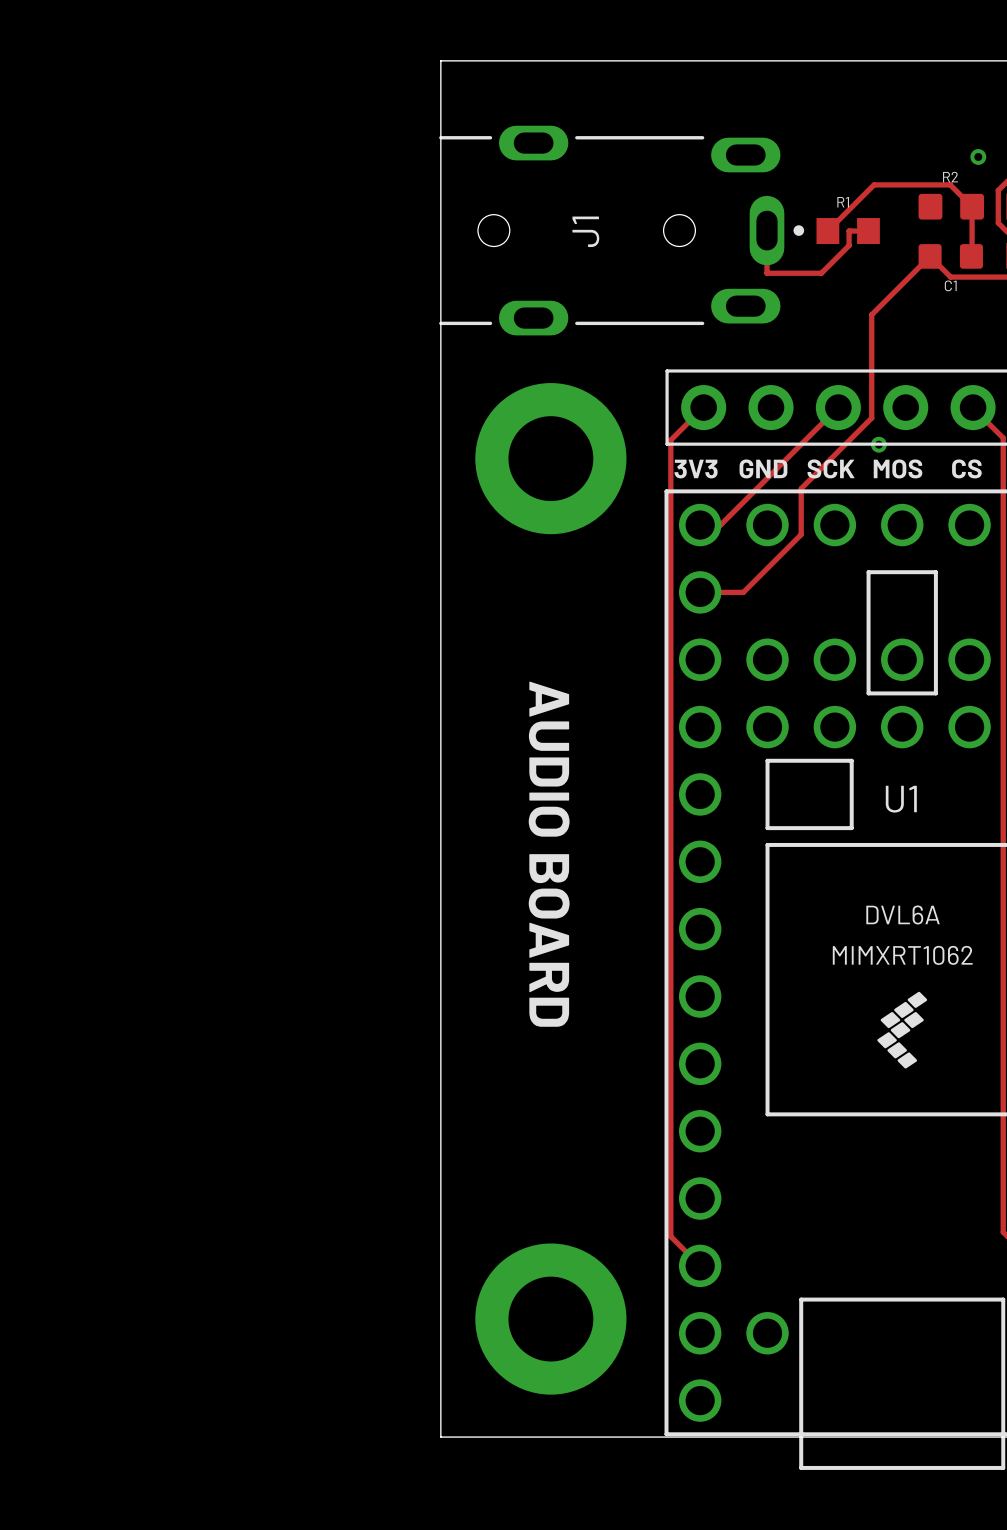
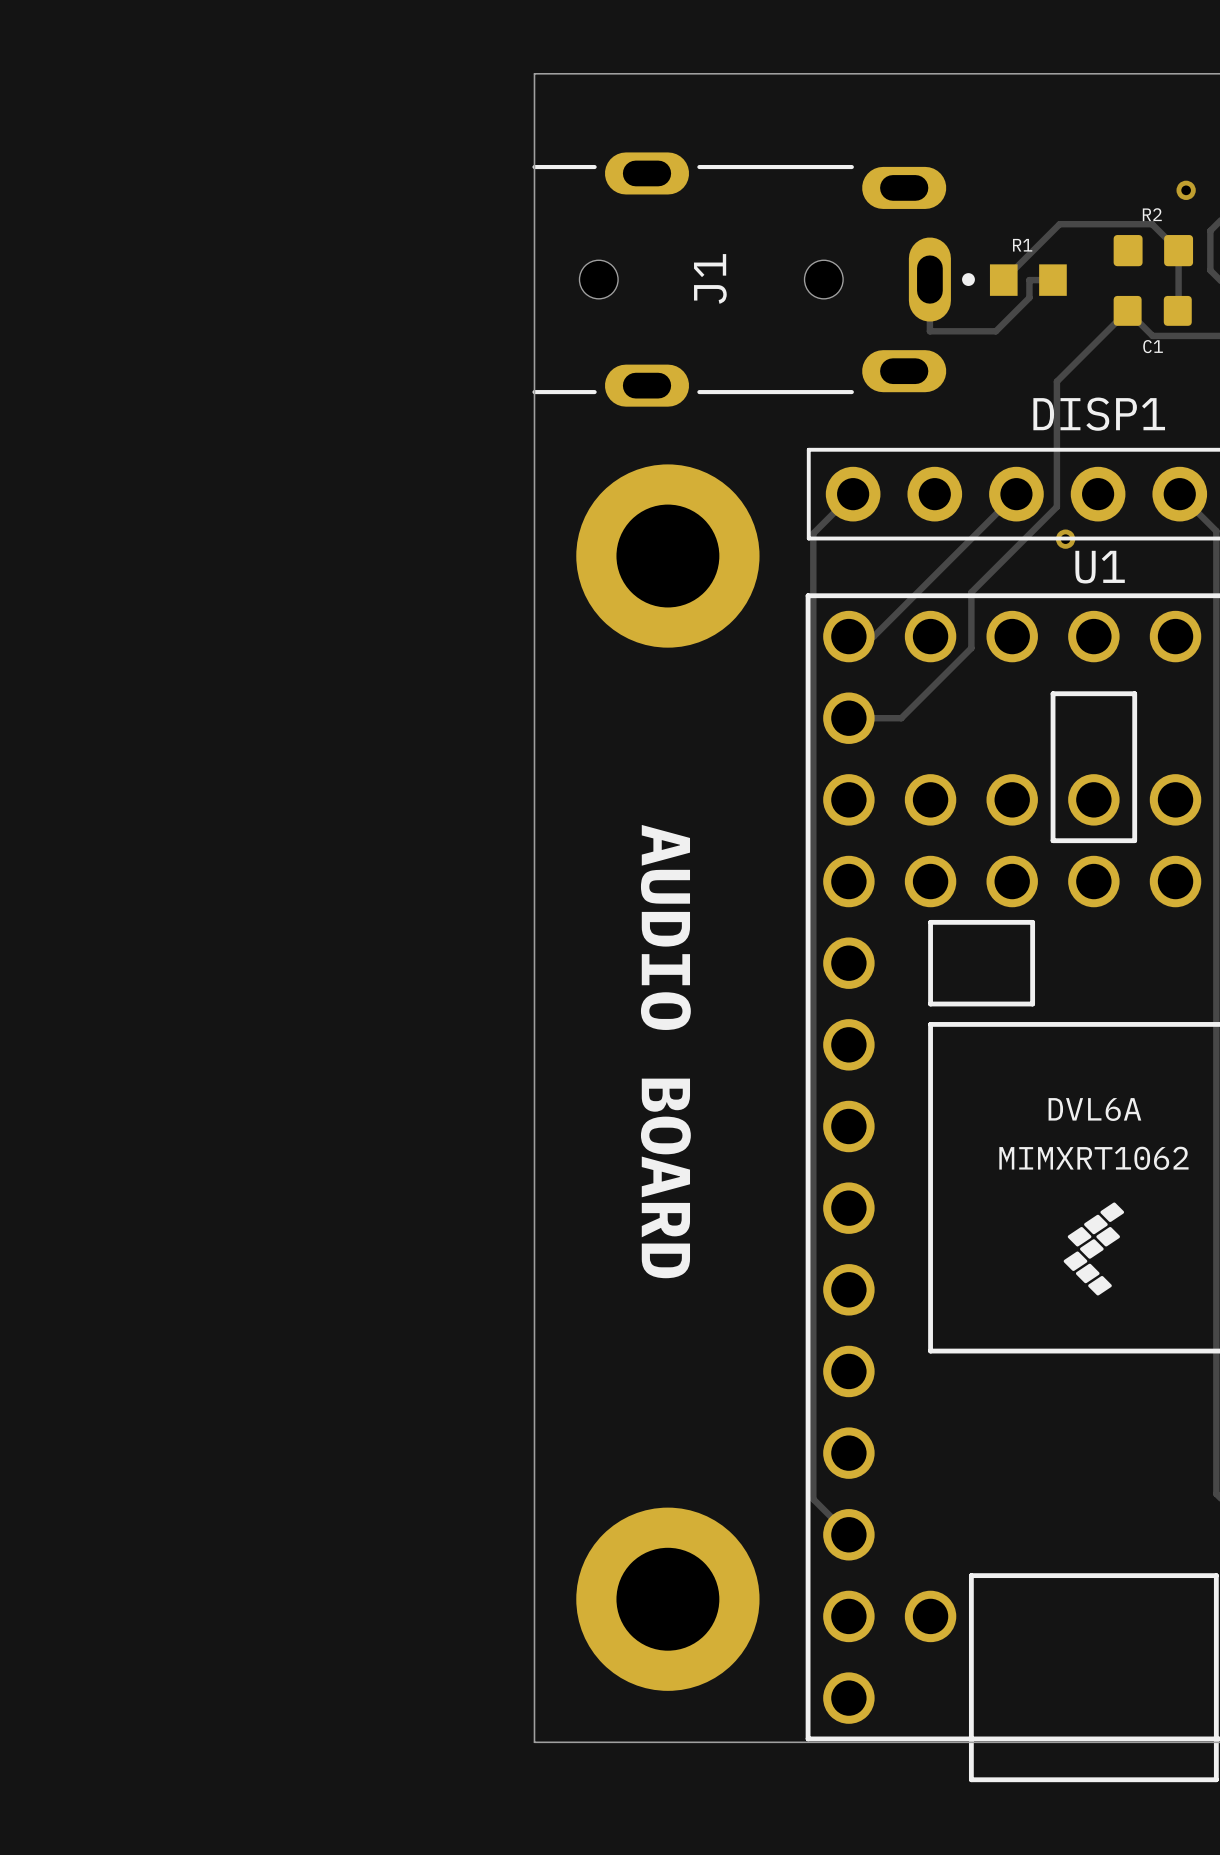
DISP1 name: none -> DISP1 (1099, 414)
text: GND (763, 468) -> none
text: SCK (831, 468) -> none
text: MOS (898, 468) -> none
text: CS (966, 468) -> none
text: 3V3 (696, 469) -> none
U1 name position: U1 (901, 799) -> U1 (1100, 567)

